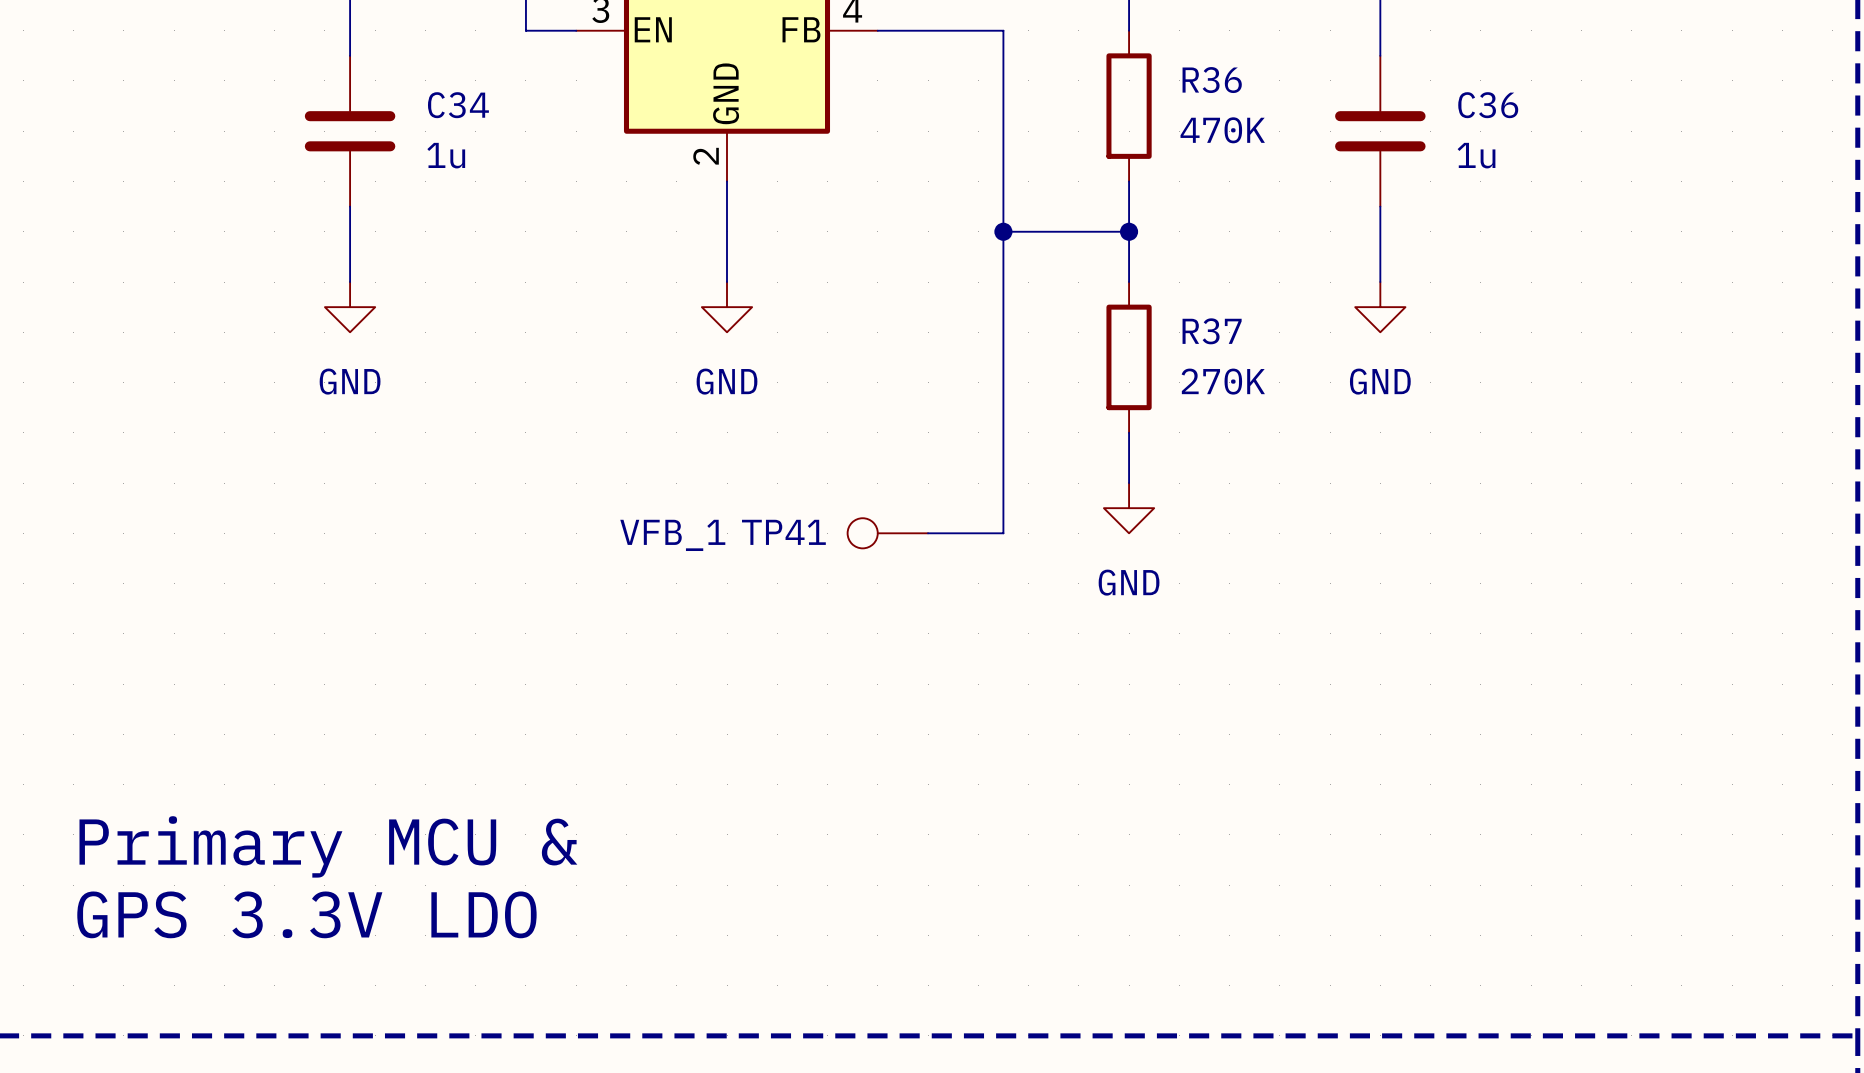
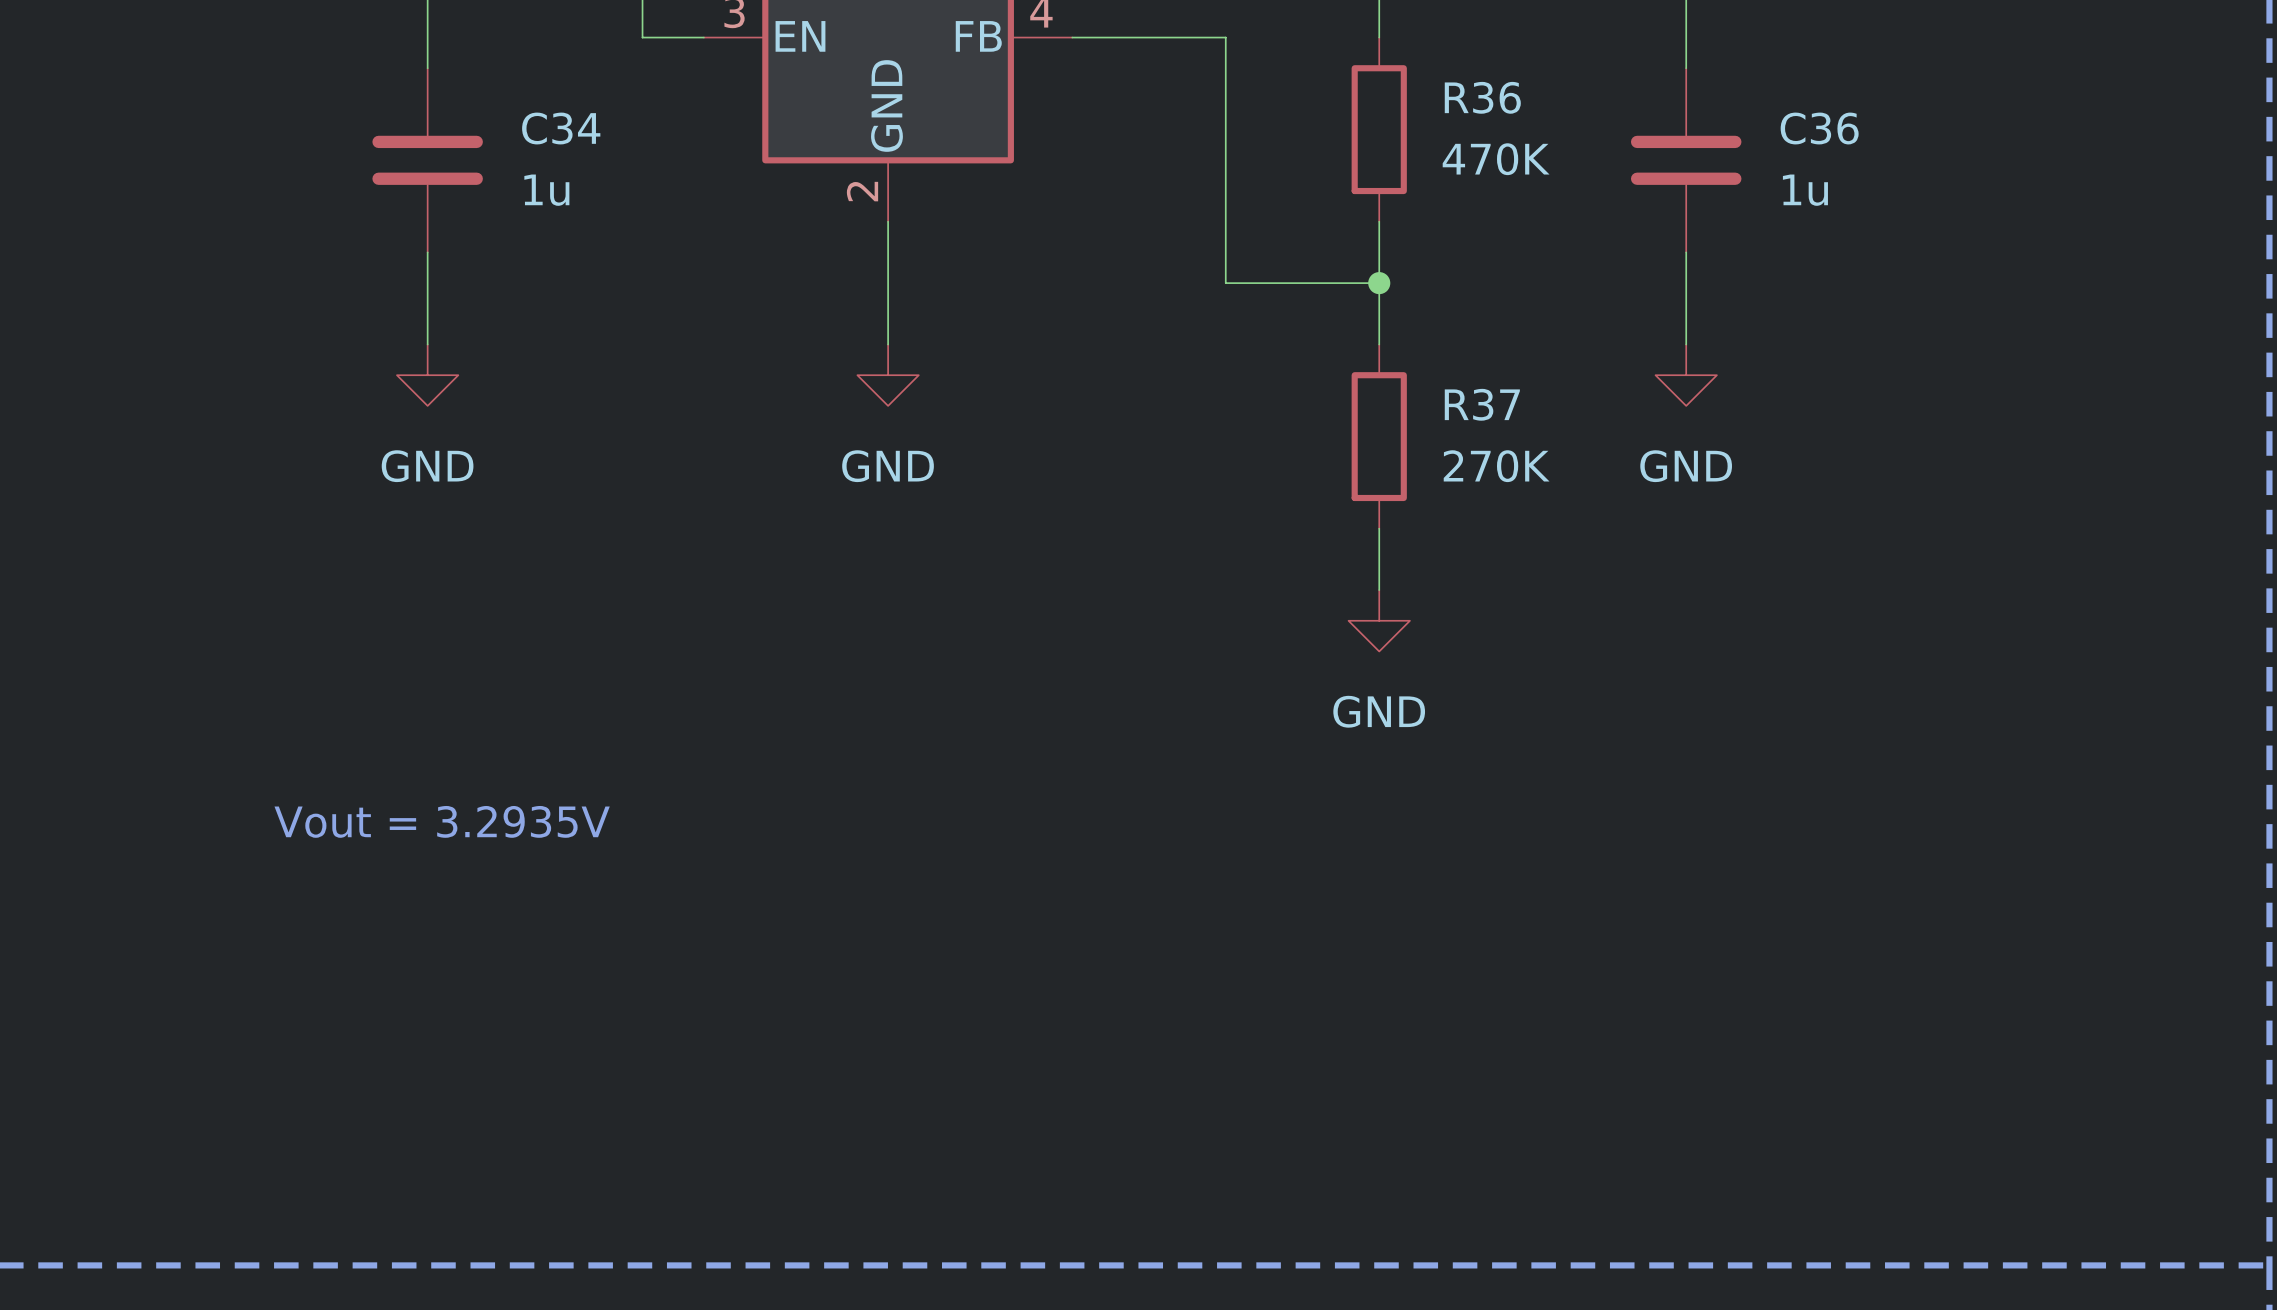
wire: (1003, 231) (1003, 533) (928, 533) -> none
junction: (1003, 231) -> none
TP41: VFB_1 (887, 533) -> none
text: none -> Vout = 3.2935V (442, 821)
text: Primary MCU & (328, 846) -> none
text: GPS 3.3V LDO (306, 914) -> none

